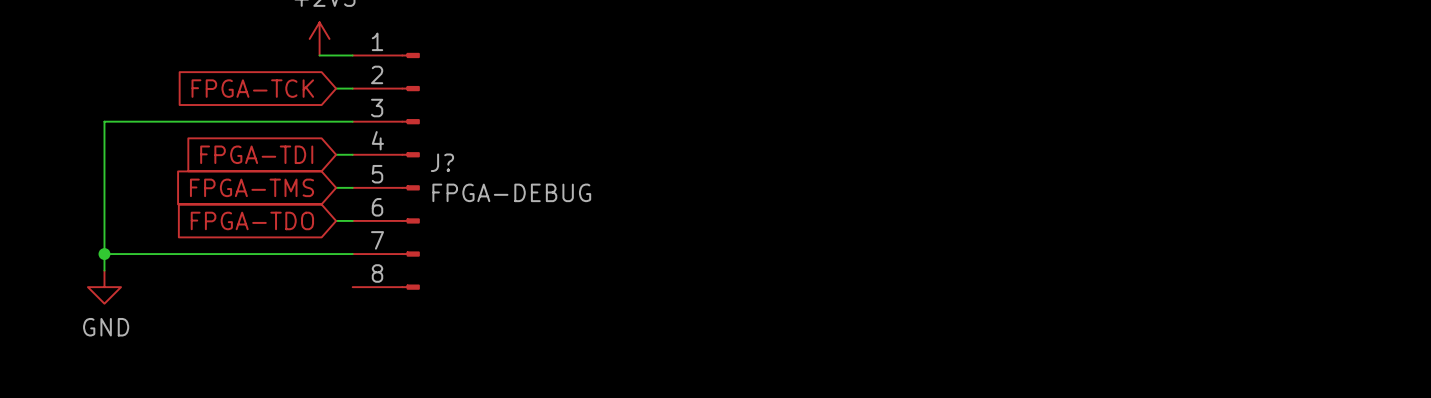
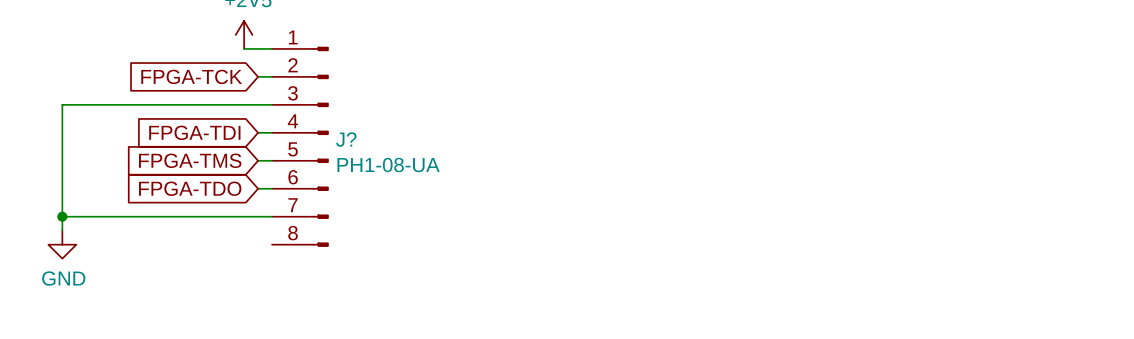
J? value: FPGA-DEBUG (511, 192) -> PH1-08-UA (388, 165)

